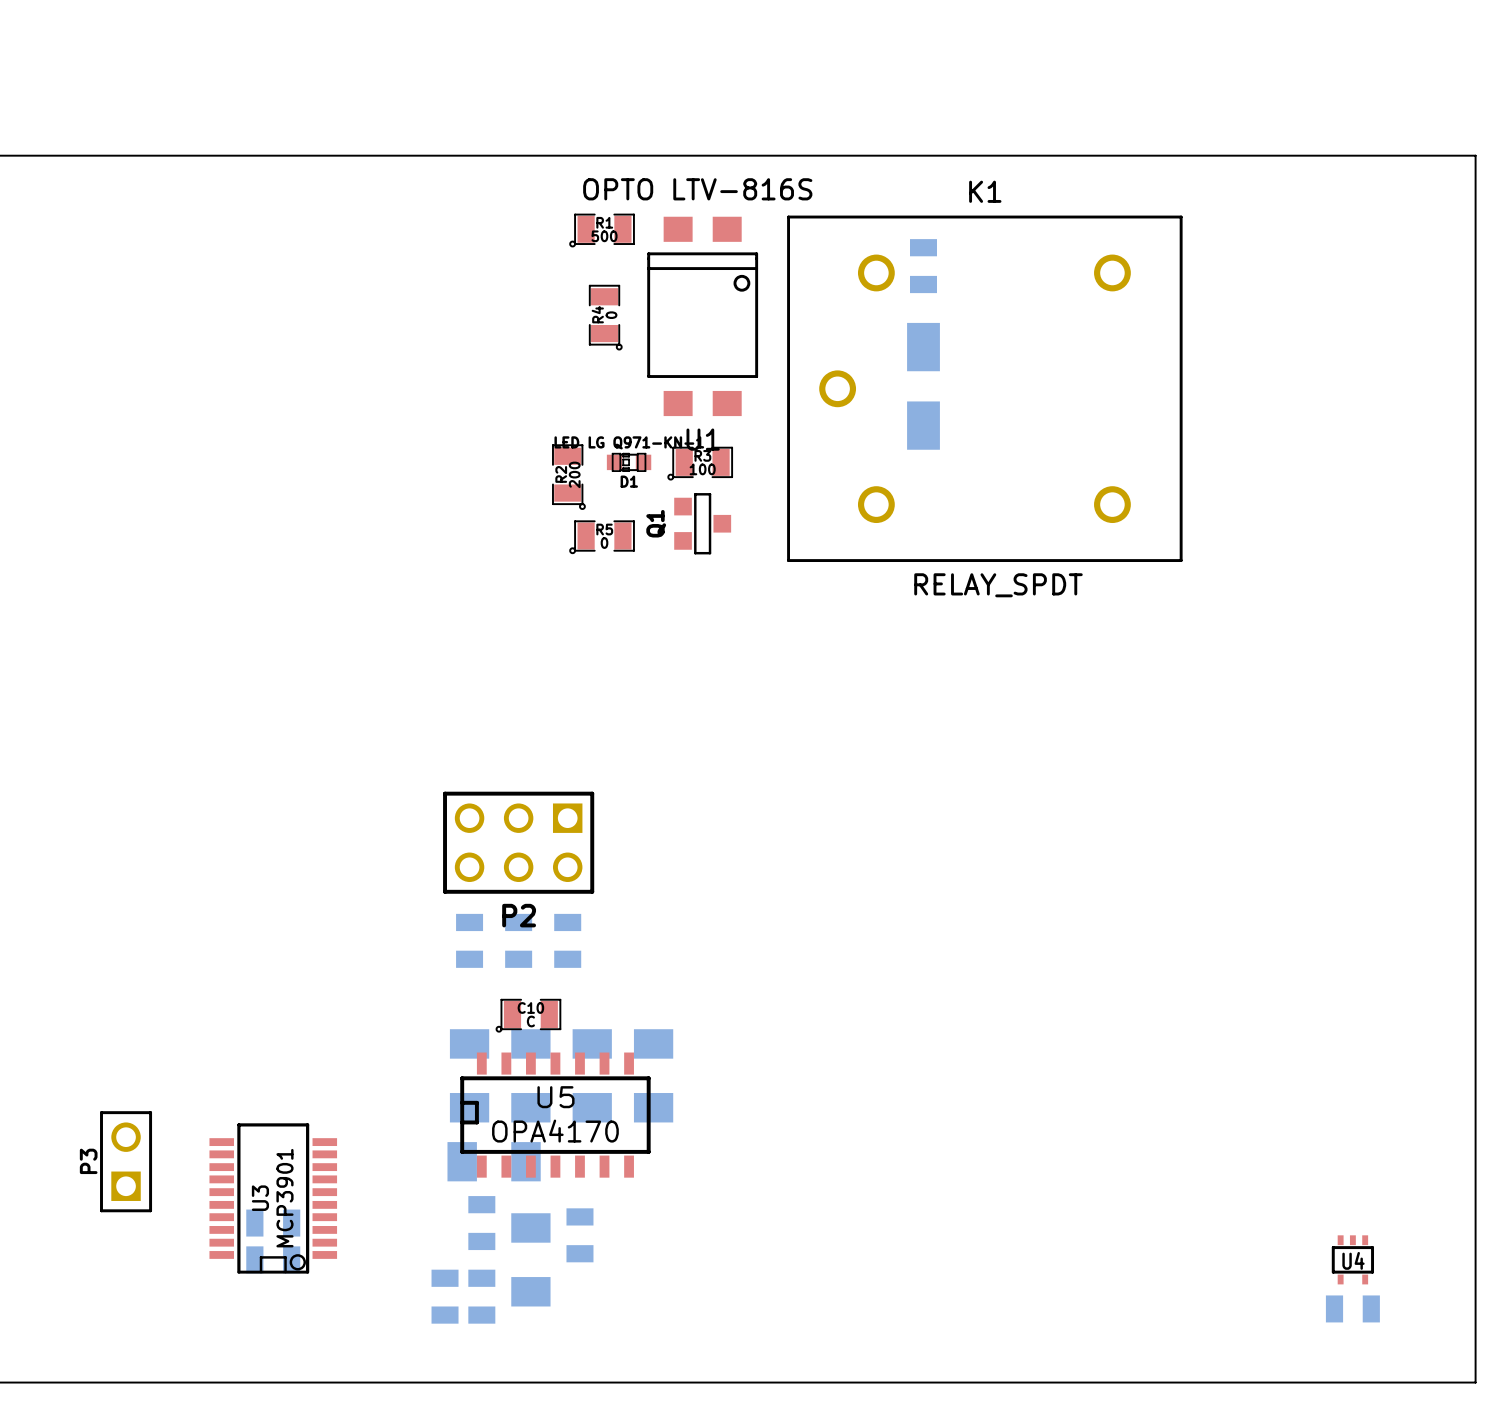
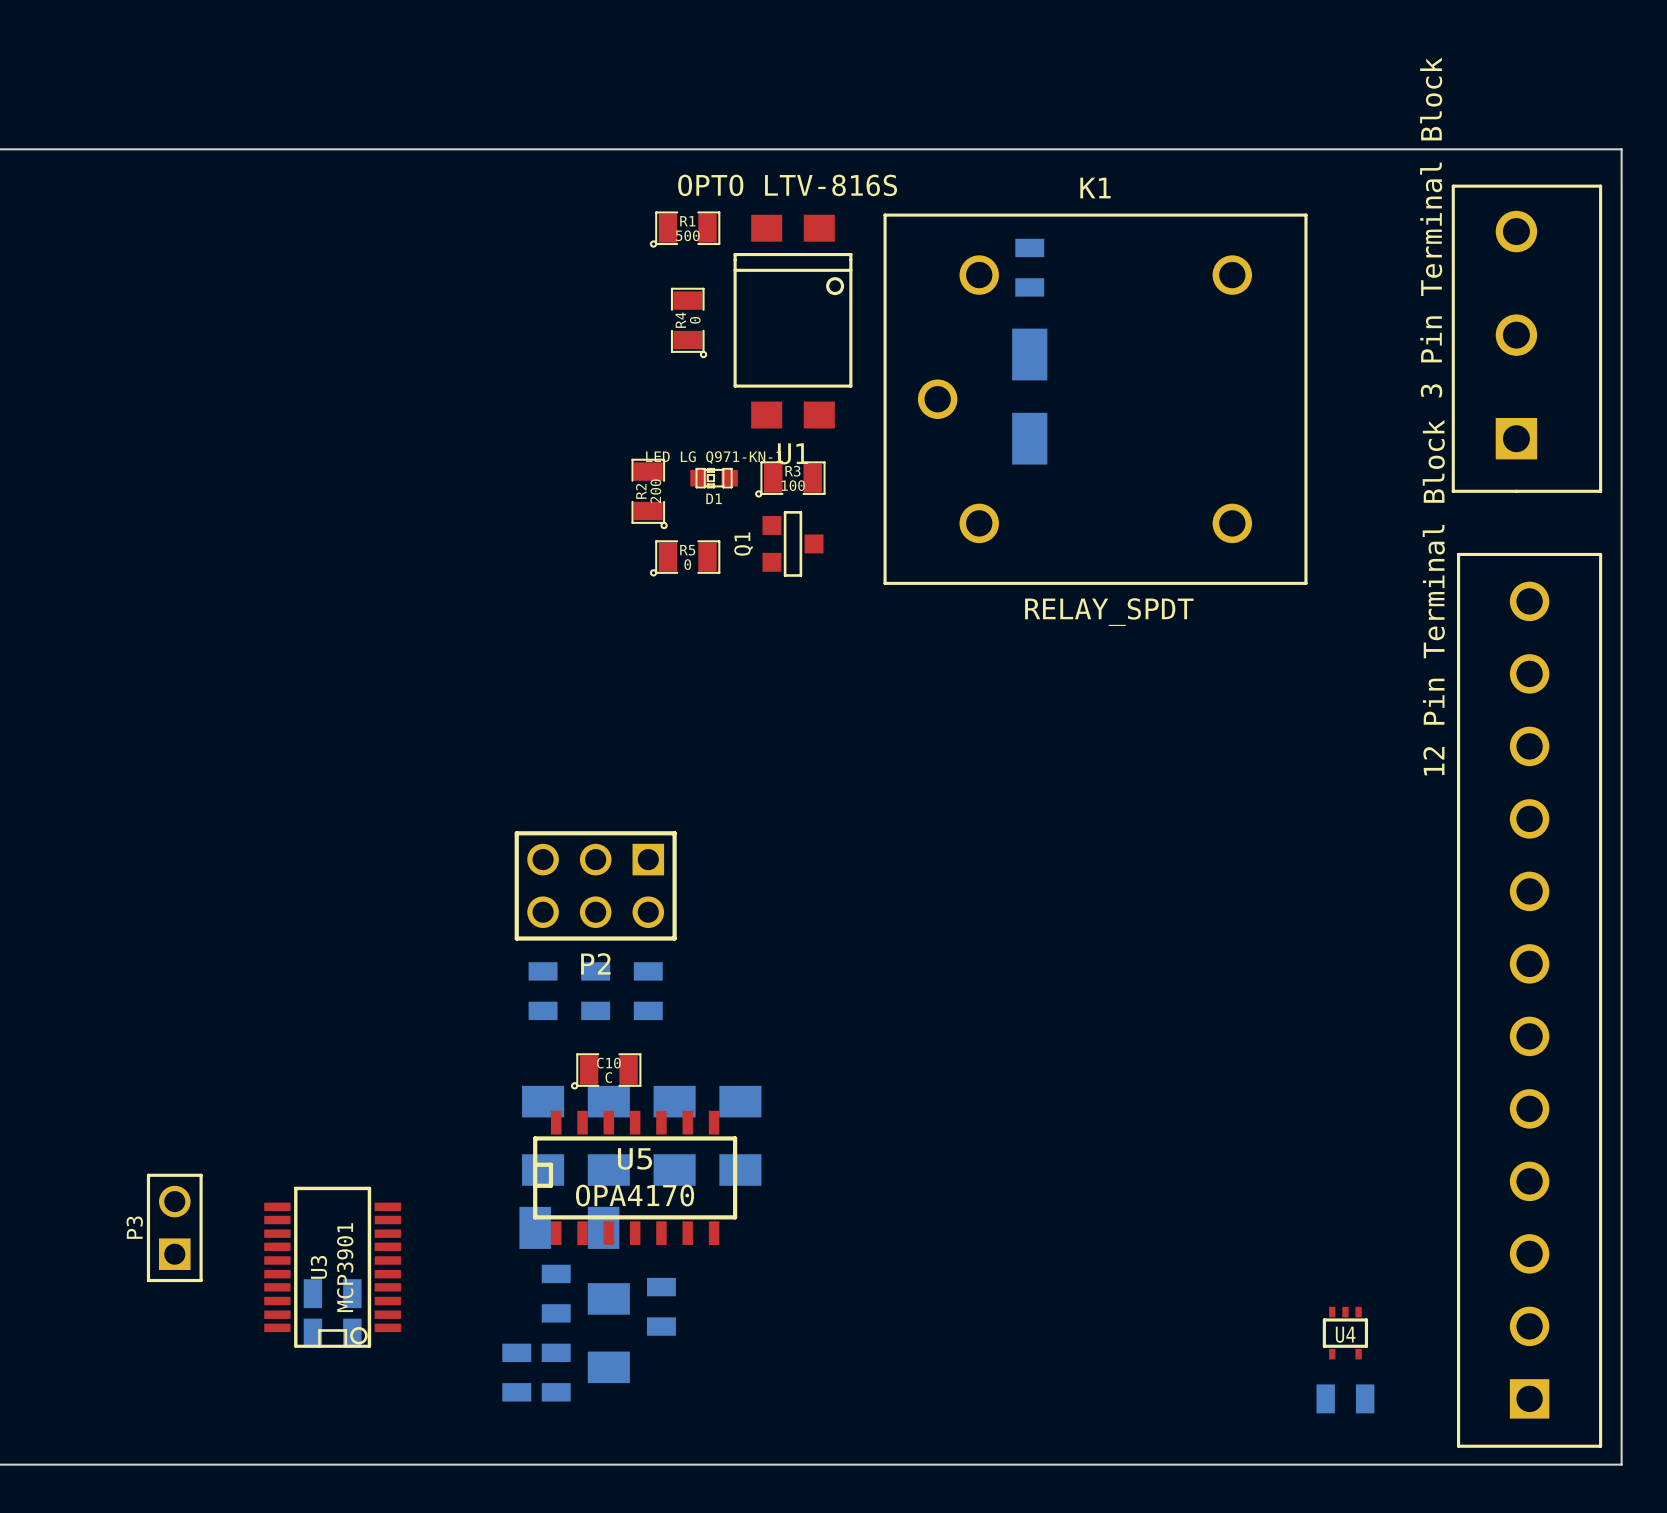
part: none -> 3 Pin Terminal Block (1526, 338)
part: none -> 12 Pin Terminal Block (1529, 1000)
U4 position: (1352, 1259) -> (1345, 1333)
part position: (1352, 1308) -> (1345, 1398)

